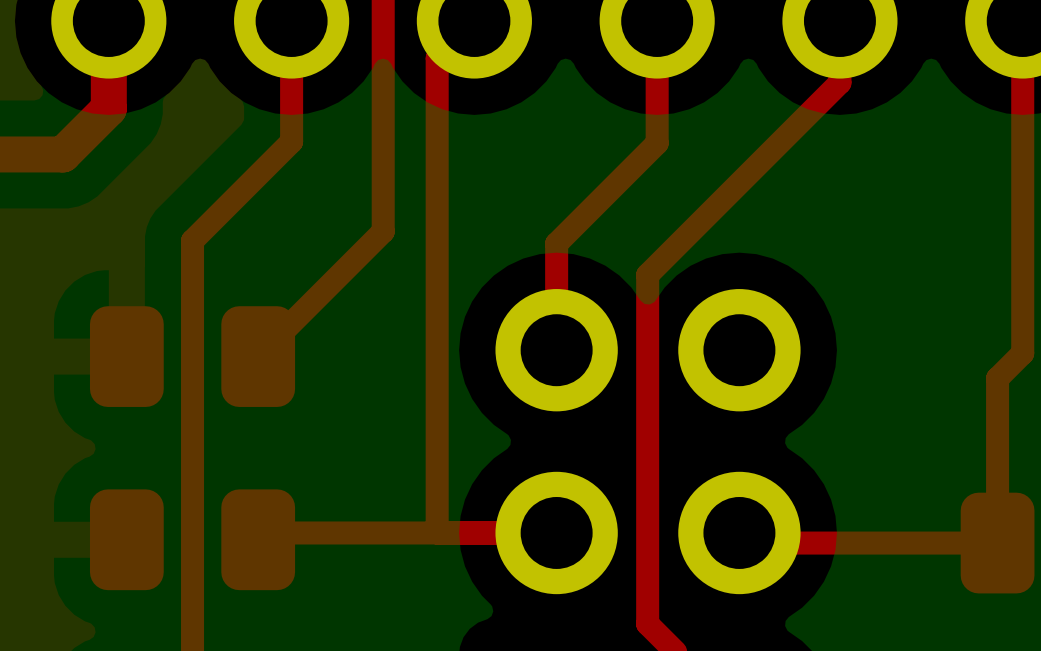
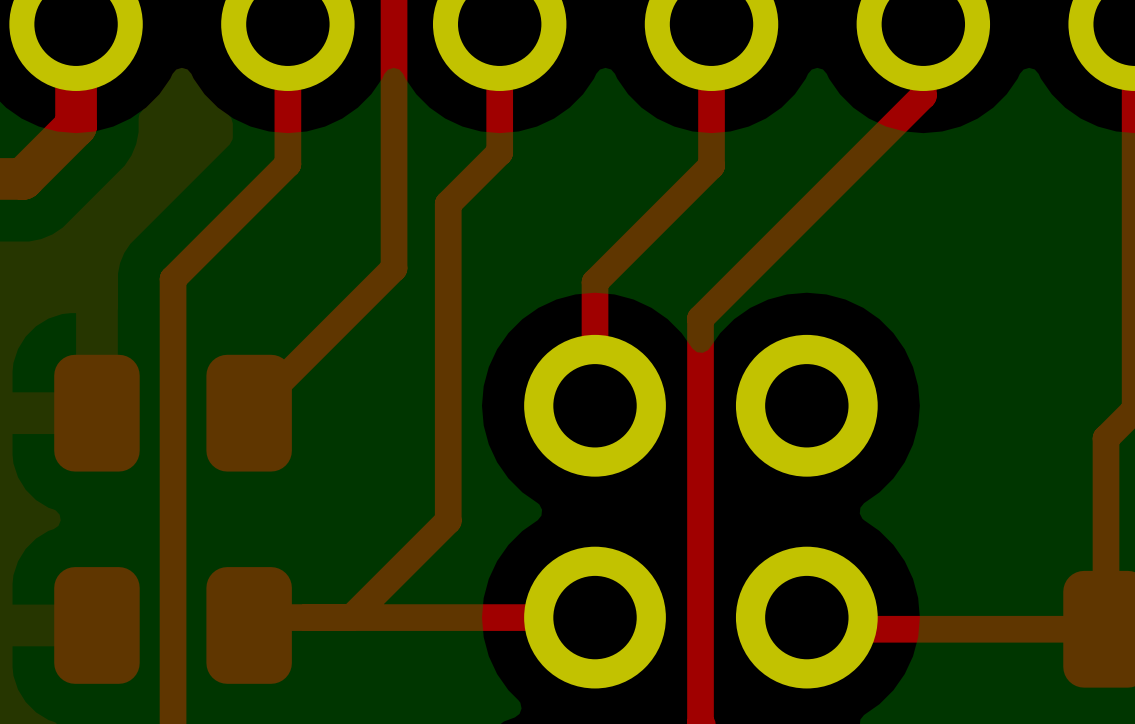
top track: (474, 20) (437, 58) (437, 532) -> (499, 24) (499, 152) (448, 203) (448, 520) (351, 617)

